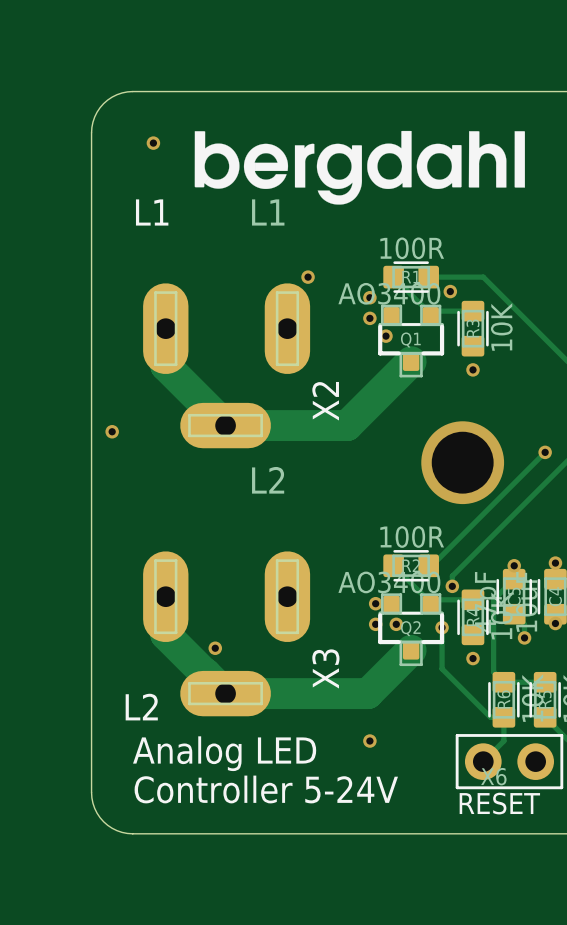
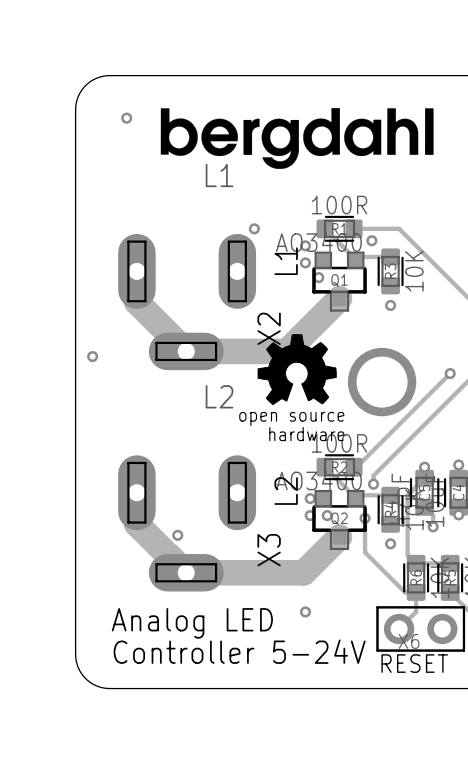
text rotation: 0° (152, 212) -> 90° counterclockwise (286, 261)
text position: L1 (152, 212) -> L1 (286, 261)
drawing: none -> [257, 334, 337, 406]
text rotation: 0° (141, 707) -> 90° counterclockwise (286, 491)
text position: L2 (141, 707) -> L2 (286, 491)

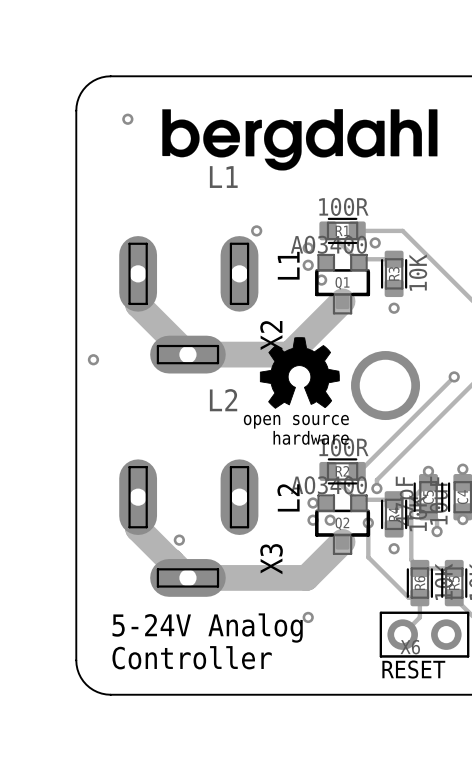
text: Analog LED (192, 623) -> 5-24V Analog (207, 628)
text: Controller 5-24V (239, 651) -> Controller (192, 657)

